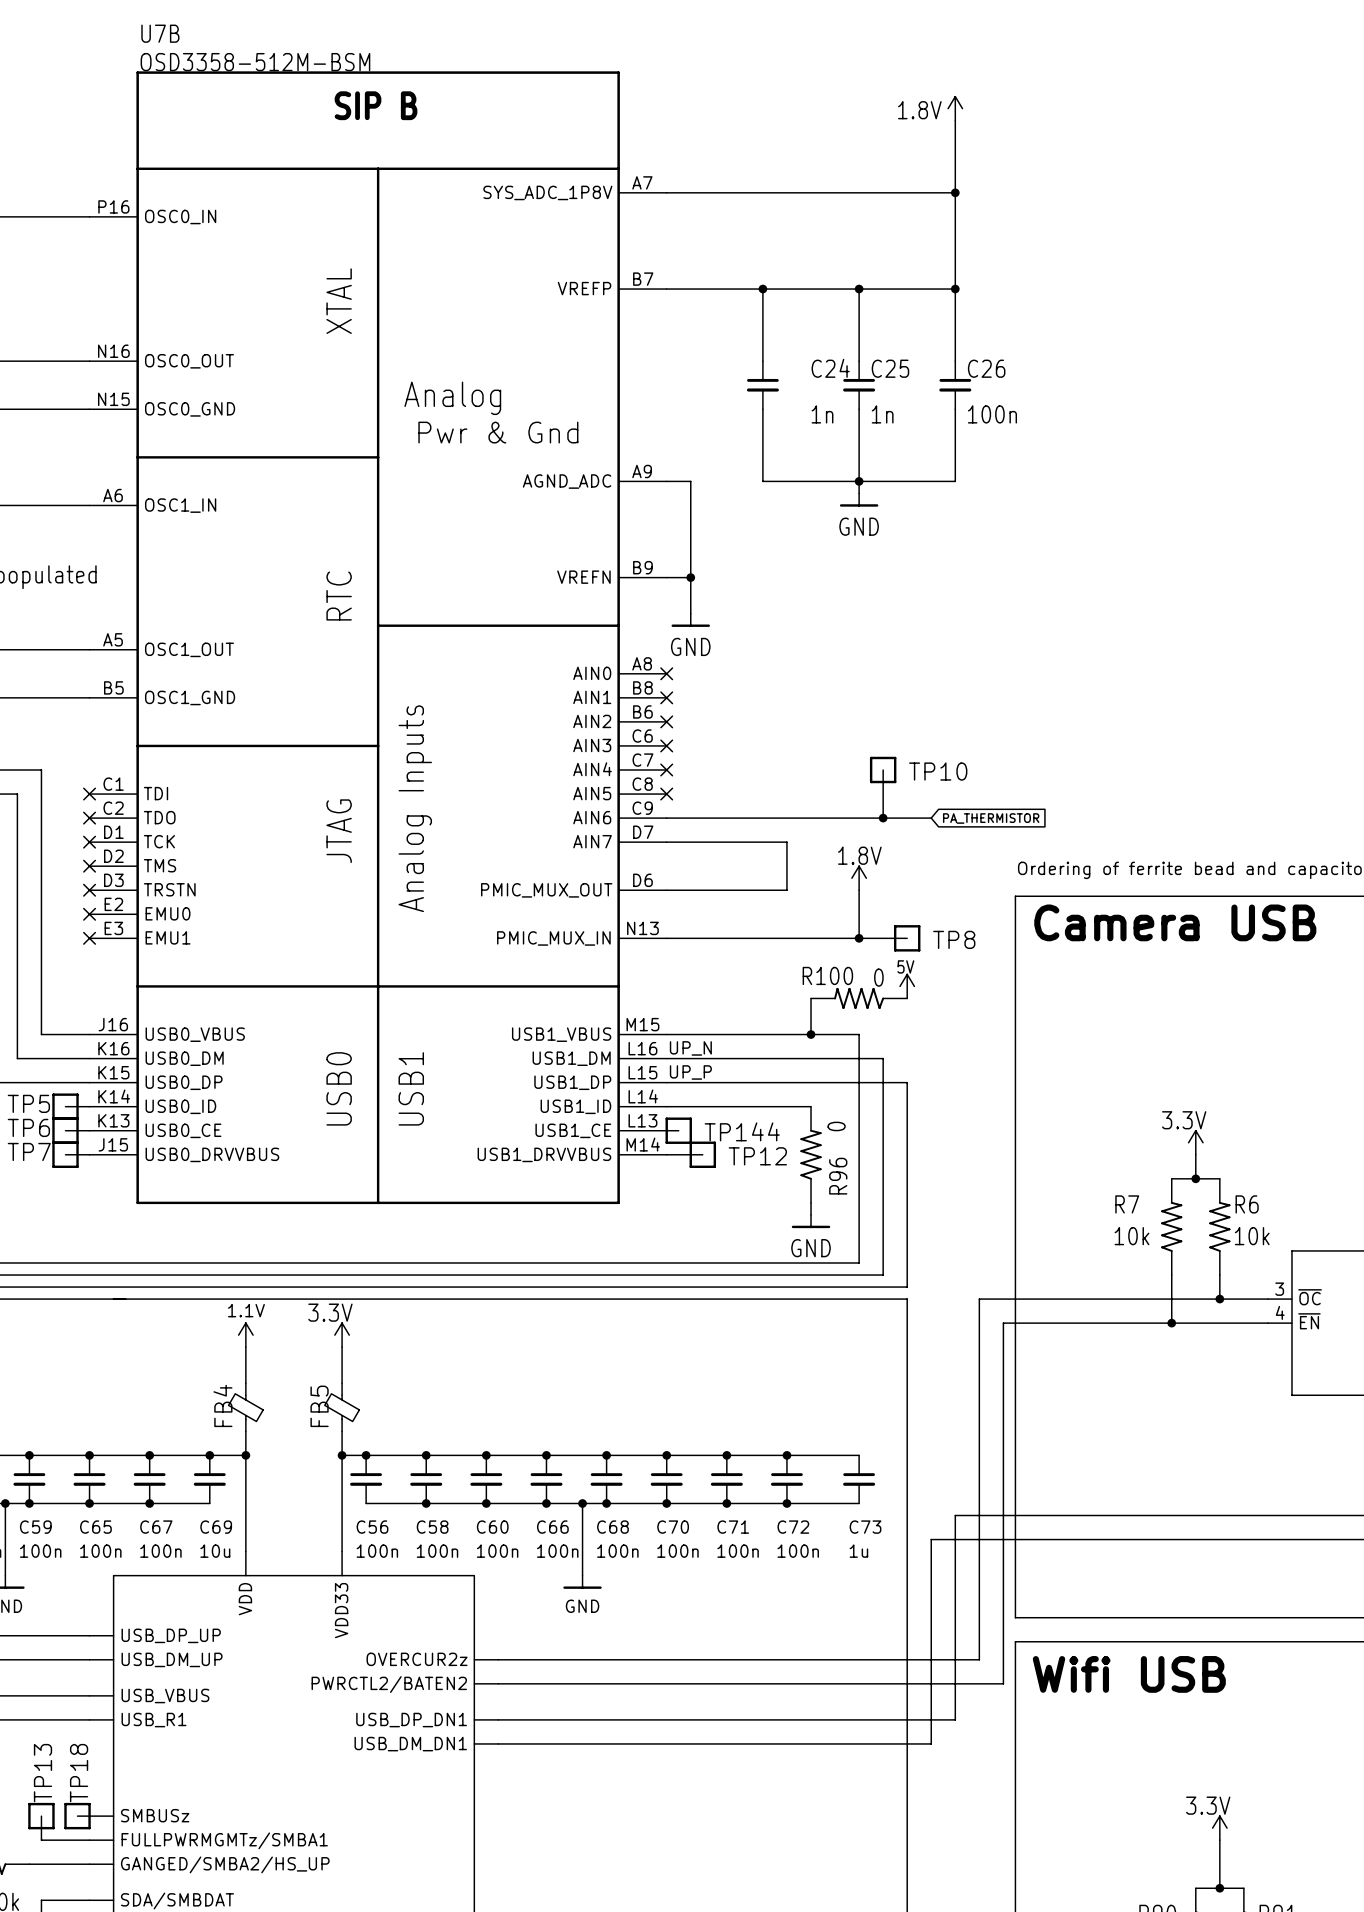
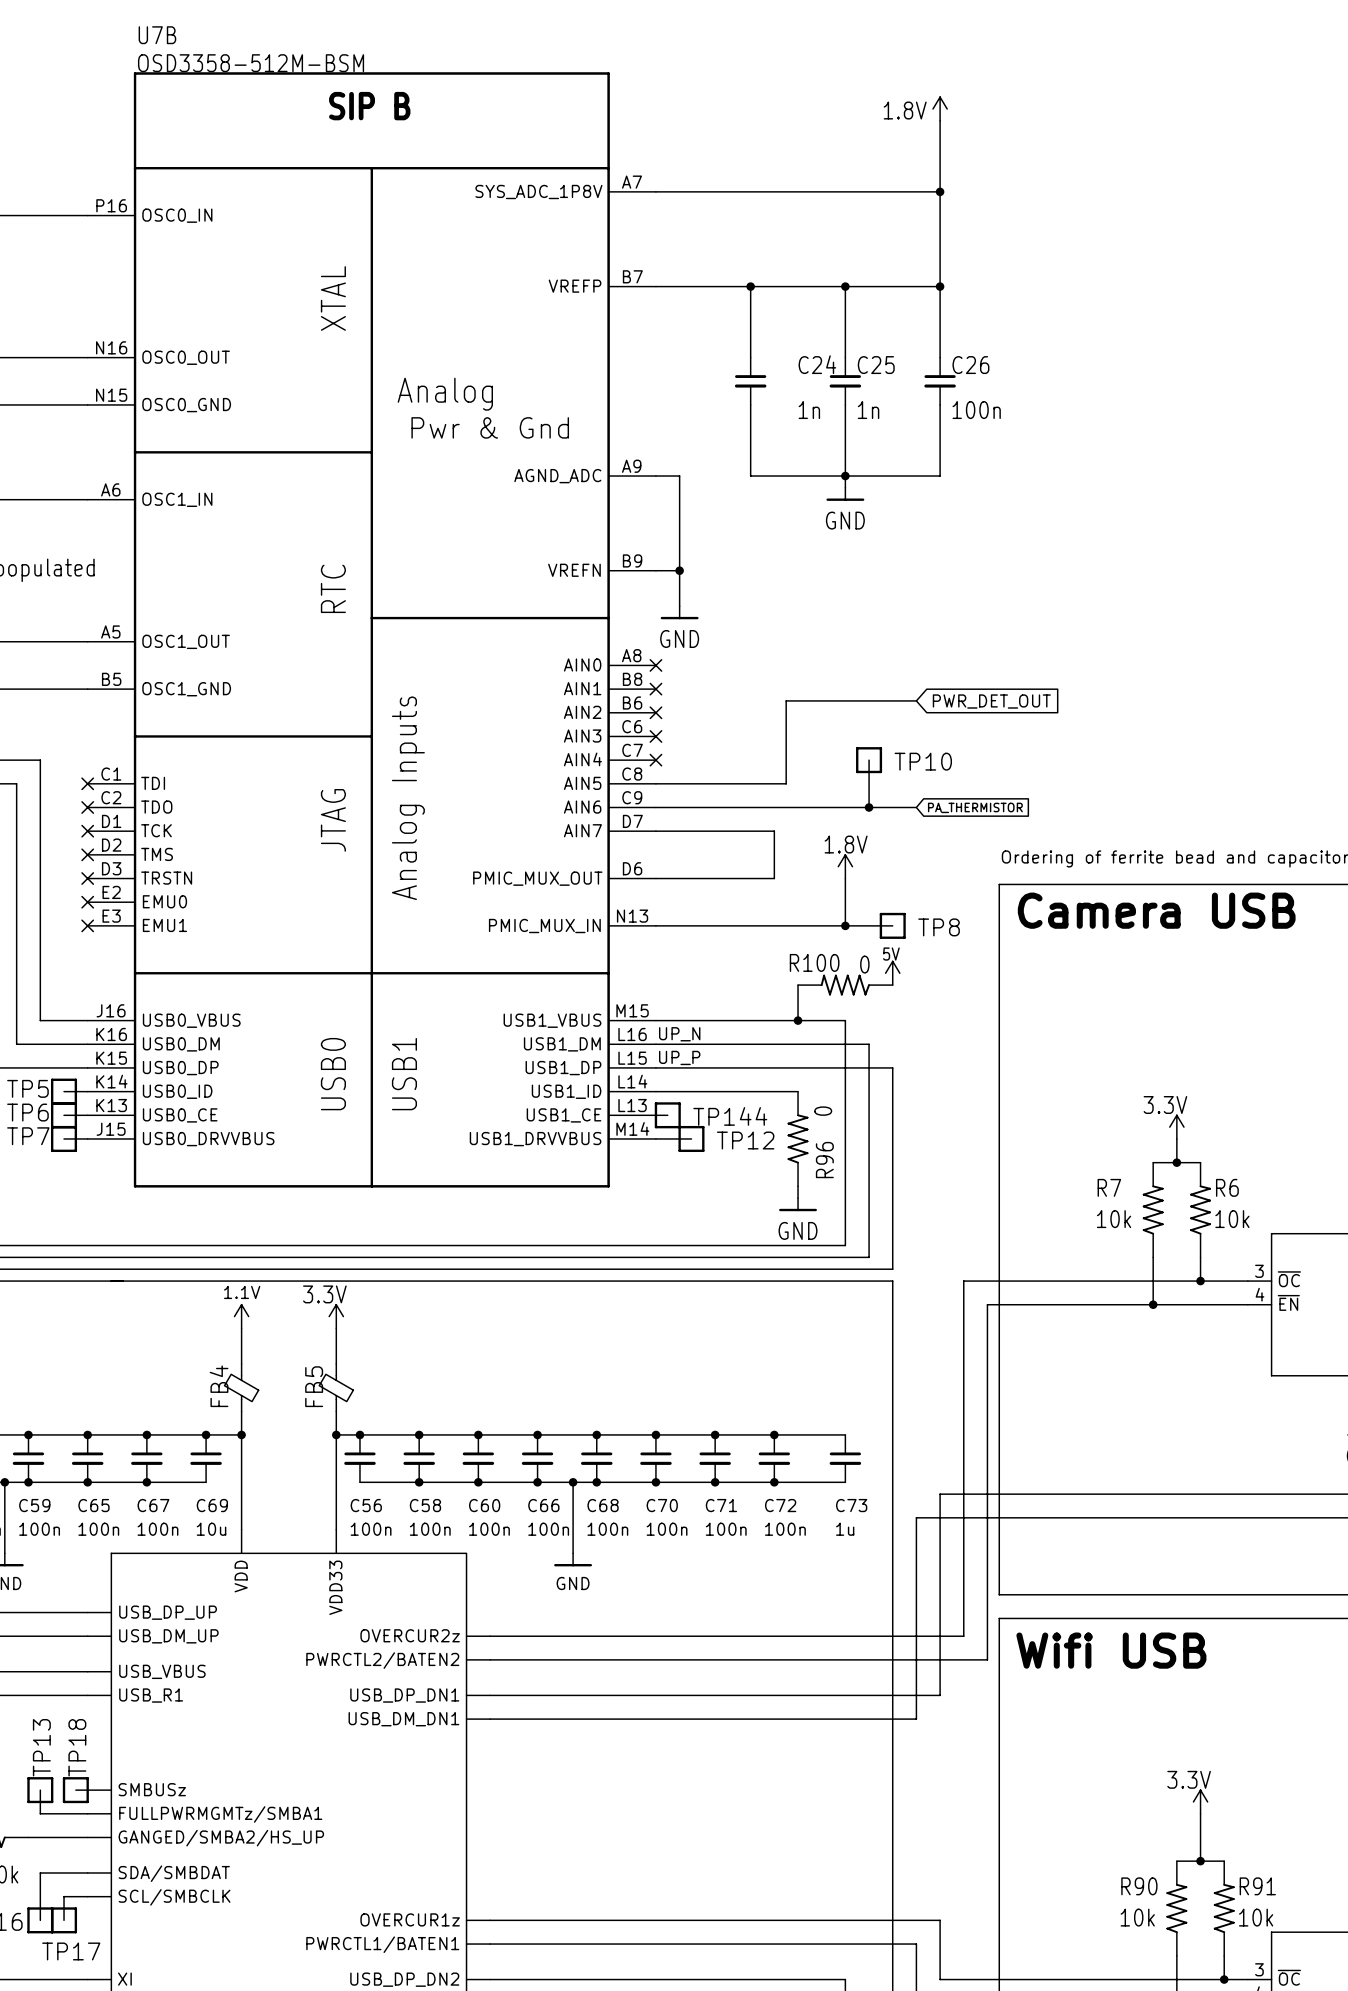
wire: none -> (916, 700) (786, 700) (786, 783) (655, 783)
global label: none -> PWR_DET_OUT (991, 701)
no-connect mark: (666, 794) -> none

